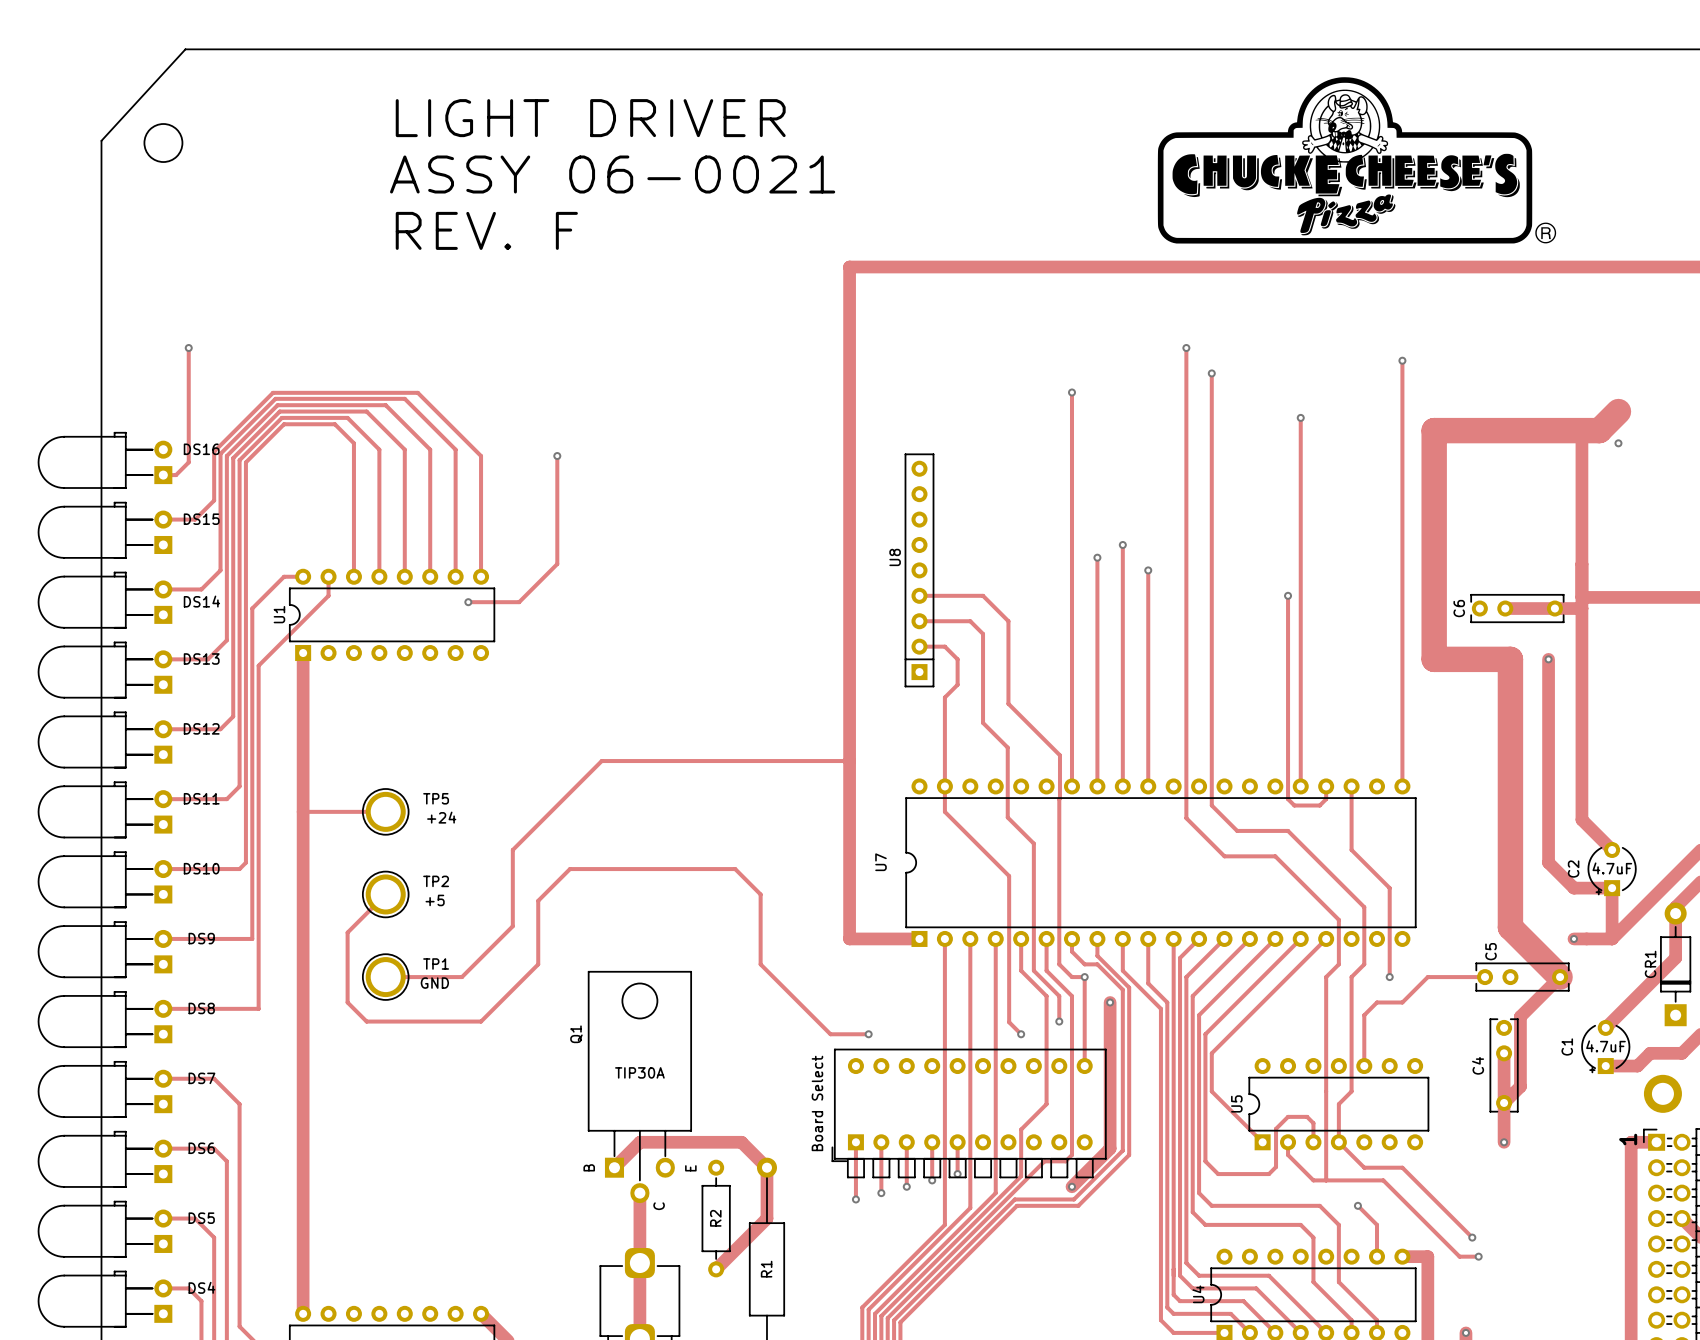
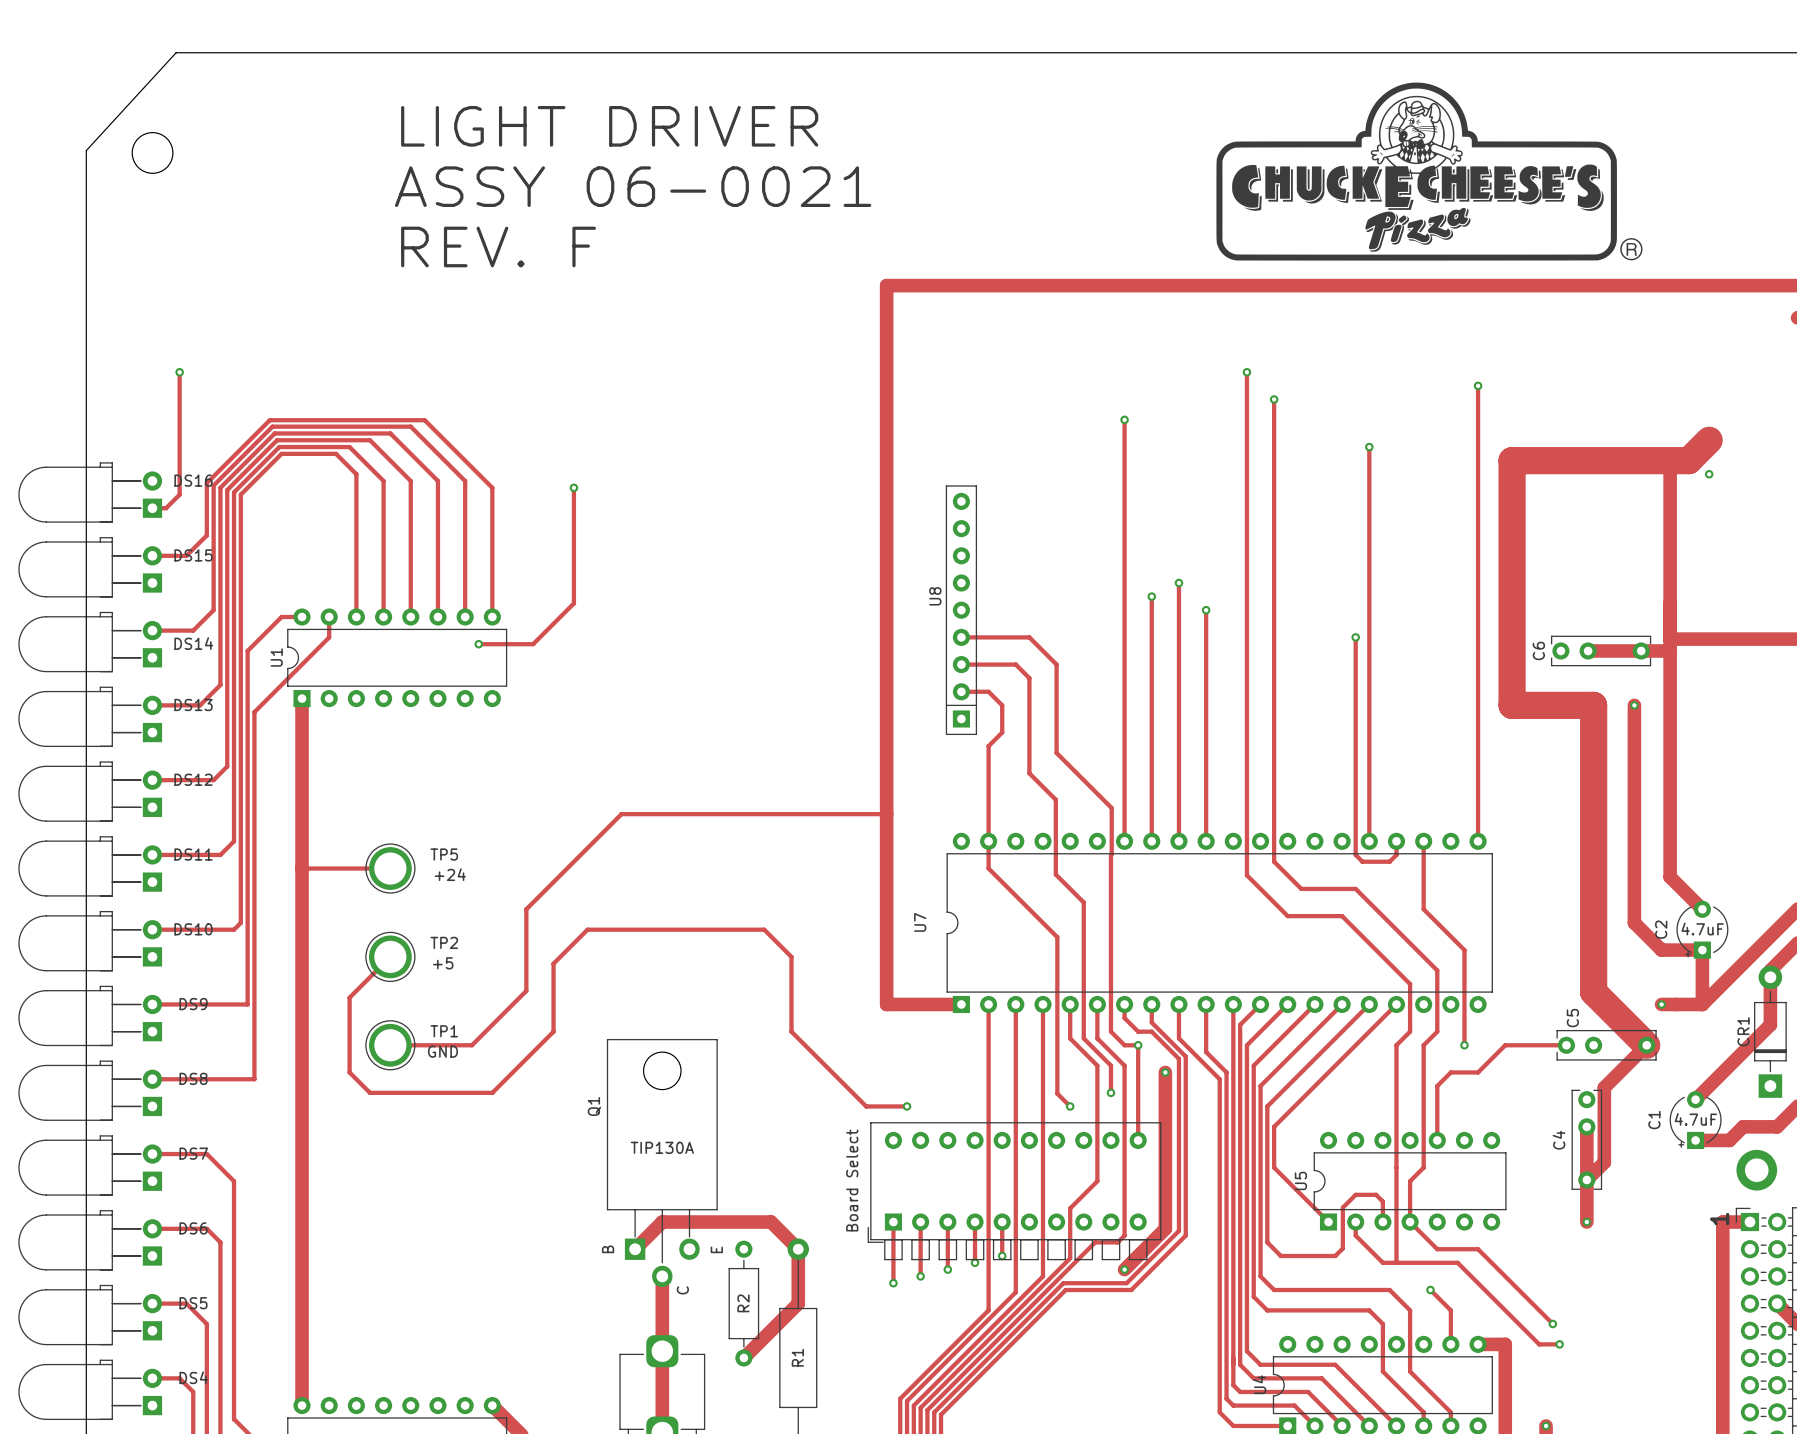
Q1 value: TIP30A (639, 1072) -> TIP130A (662, 1147)

